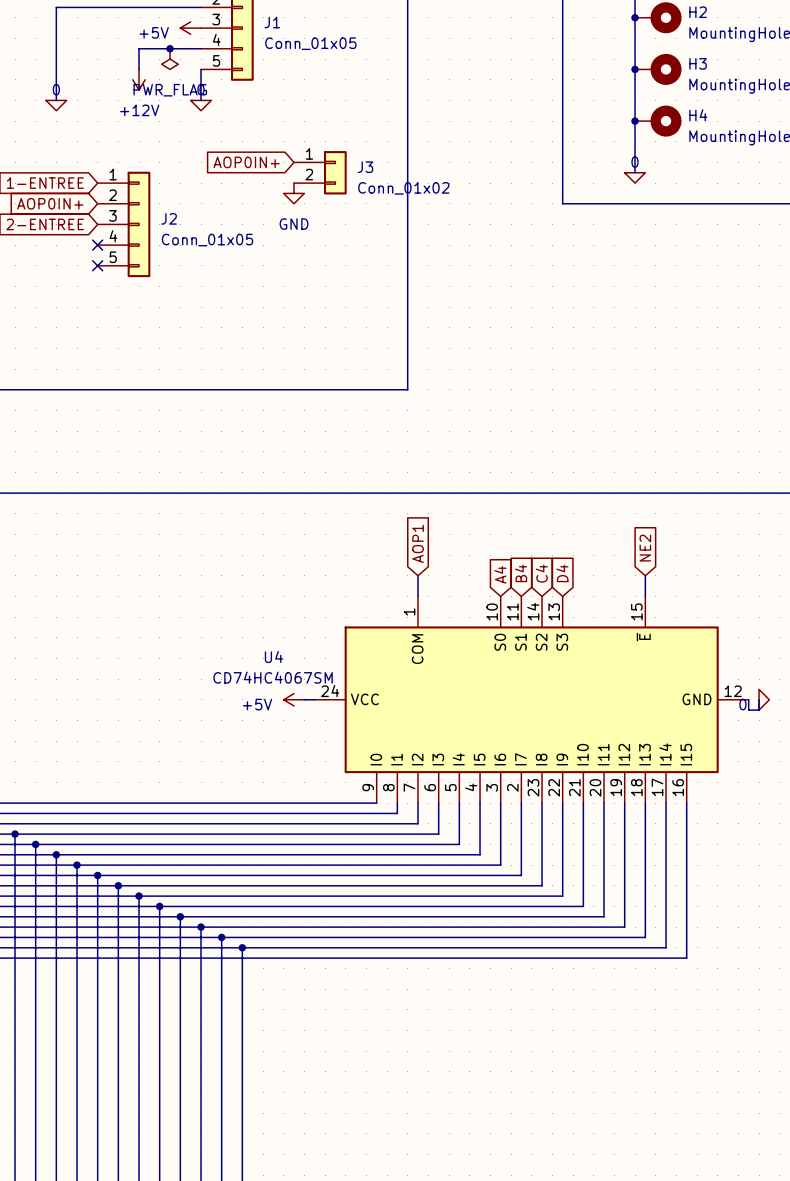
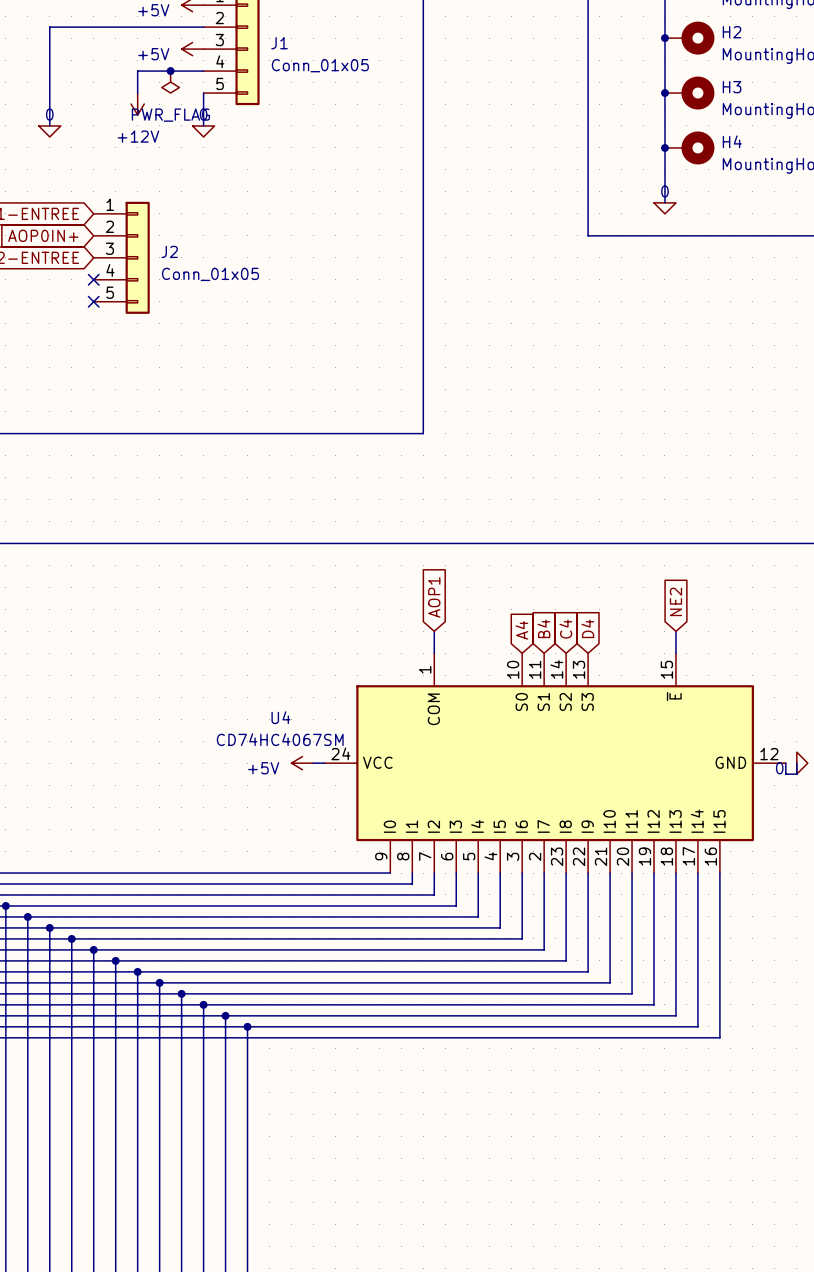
global label: AOP0IN+ (246, 162) -> none
J3: Conn_01x02 (320, 172) -> none
power symbol: GND (294, 193) -> none

